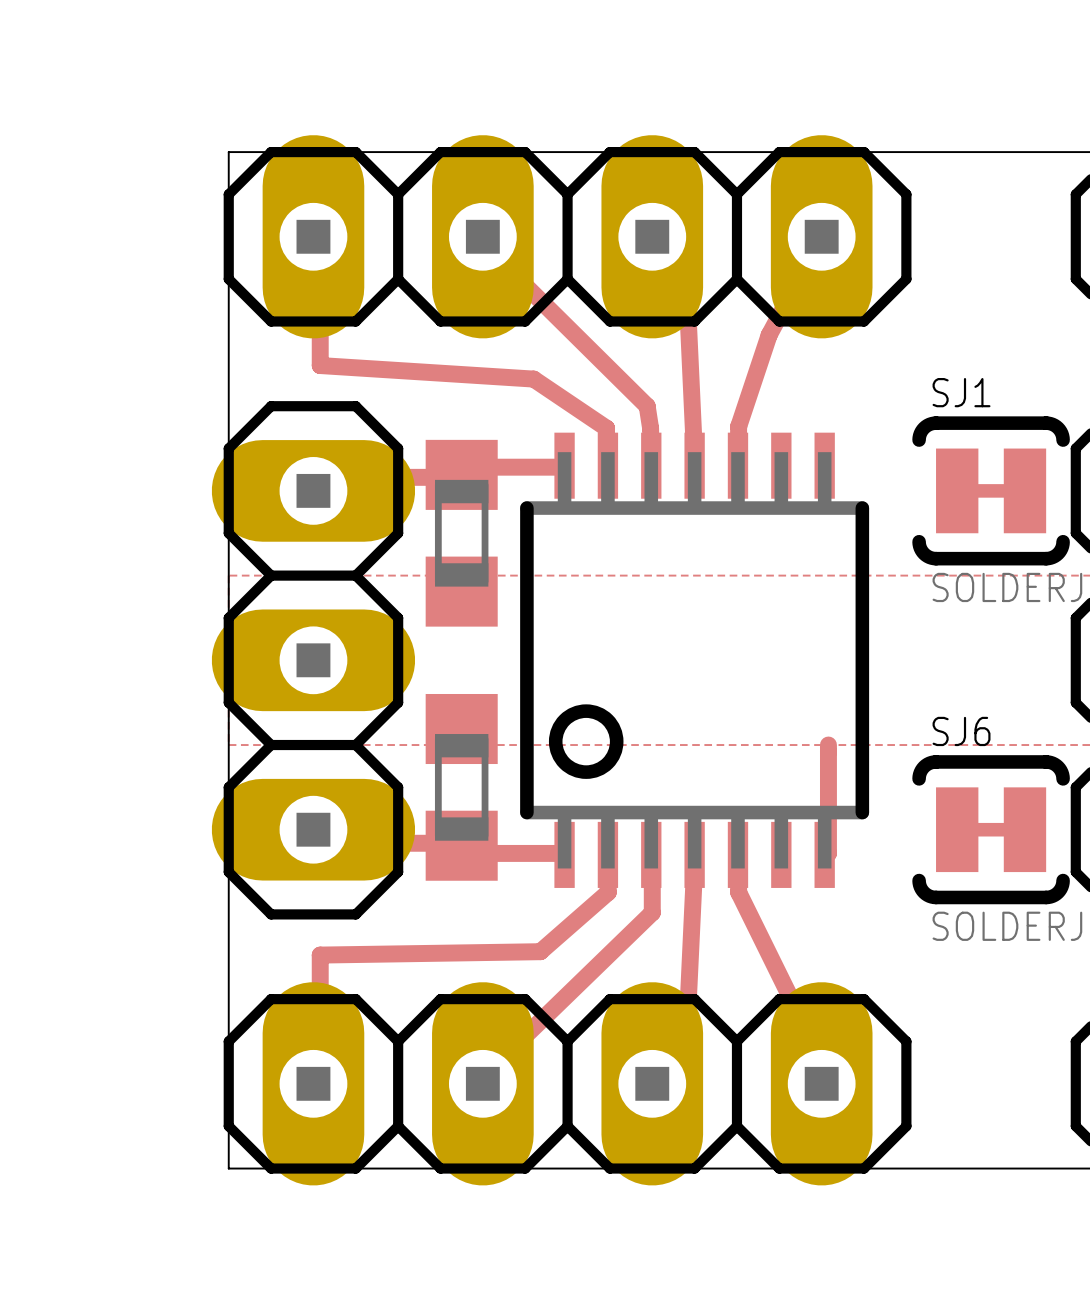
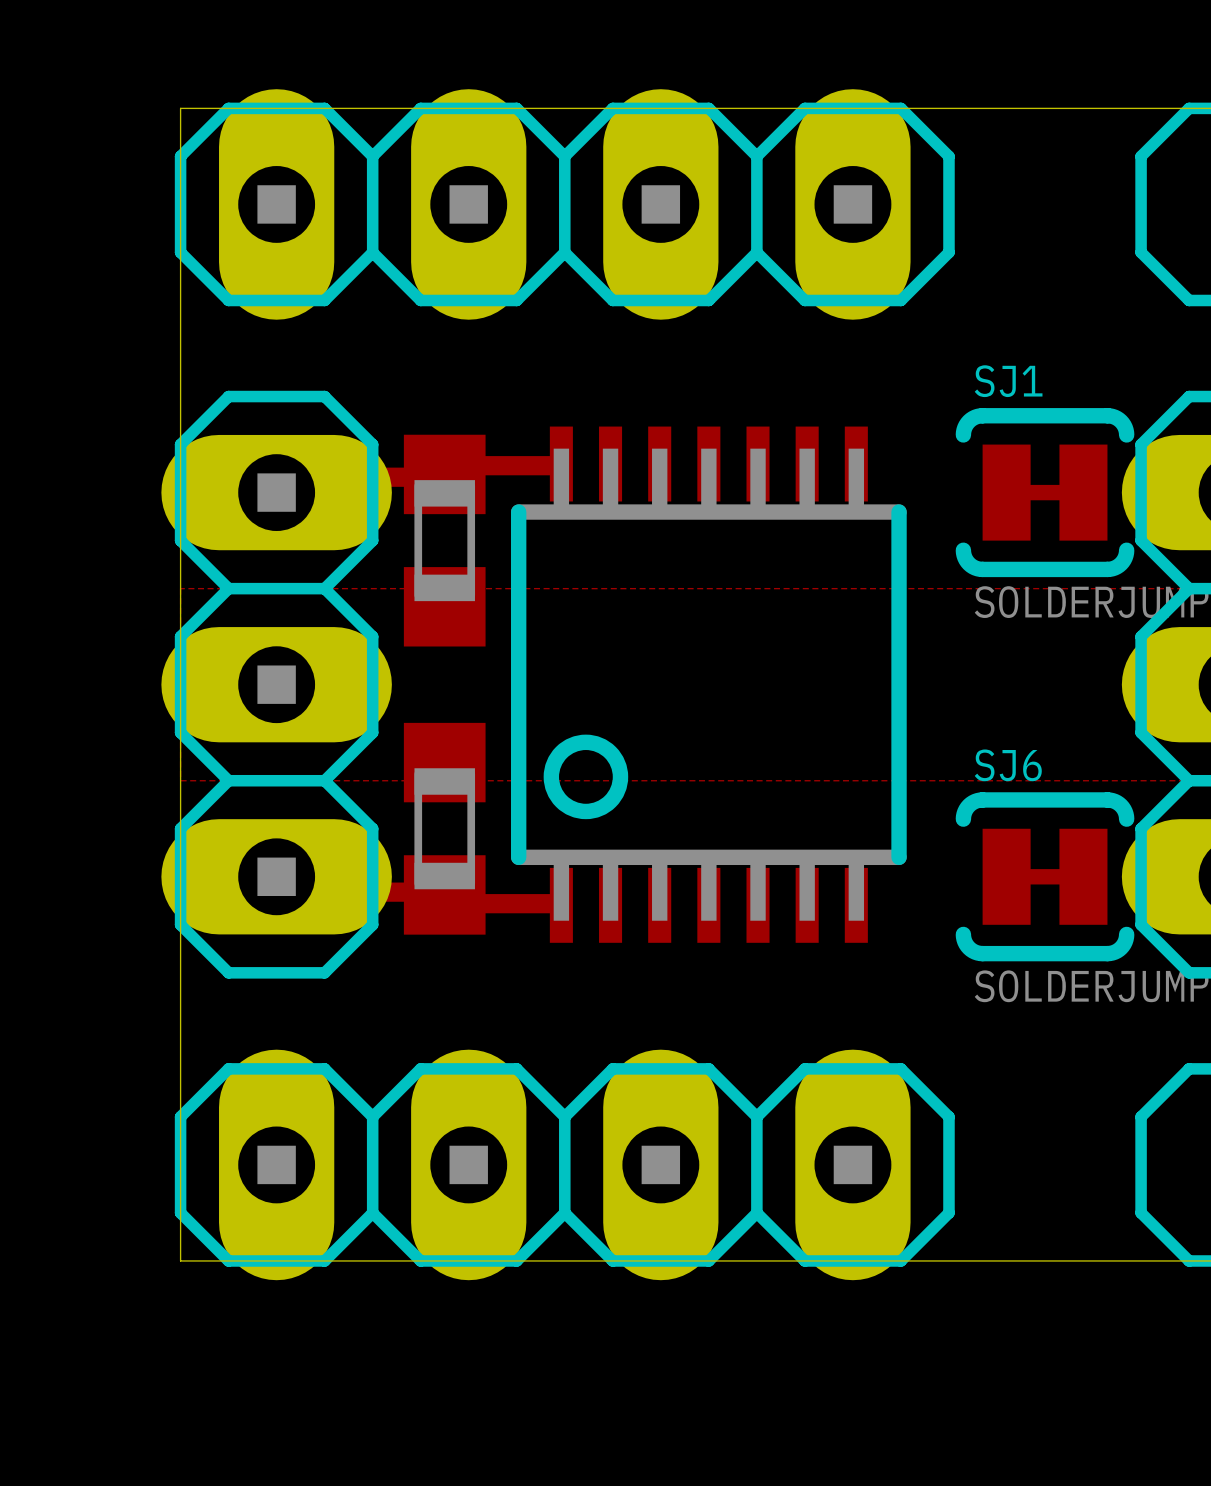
track: (313, 236) (320, 243) (320, 365) (533, 379) (606, 428) (607, 465) -> none
track: (482, 236) (482, 243) (647, 406) (650, 428) (651, 465) -> none
track: (652, 236) (655, 243) (686, 274) (694, 465) -> none
track: (821, 236) (769, 335) (738, 426) (737, 465) -> none
track: (828, 745) (828, 853) (824, 854) -> none
track: (607, 854) (608, 892) (540, 951) (320, 955) (320, 1077) (313, 1083) -> none
track: (651, 854) (652, 912) (482, 1077) (482, 1083) -> none
track: (694, 854) (686, 1046) (655, 1077) (652, 1083) -> none
track: (737, 854) (738, 892) (794, 1005) (821, 1083) -> none

